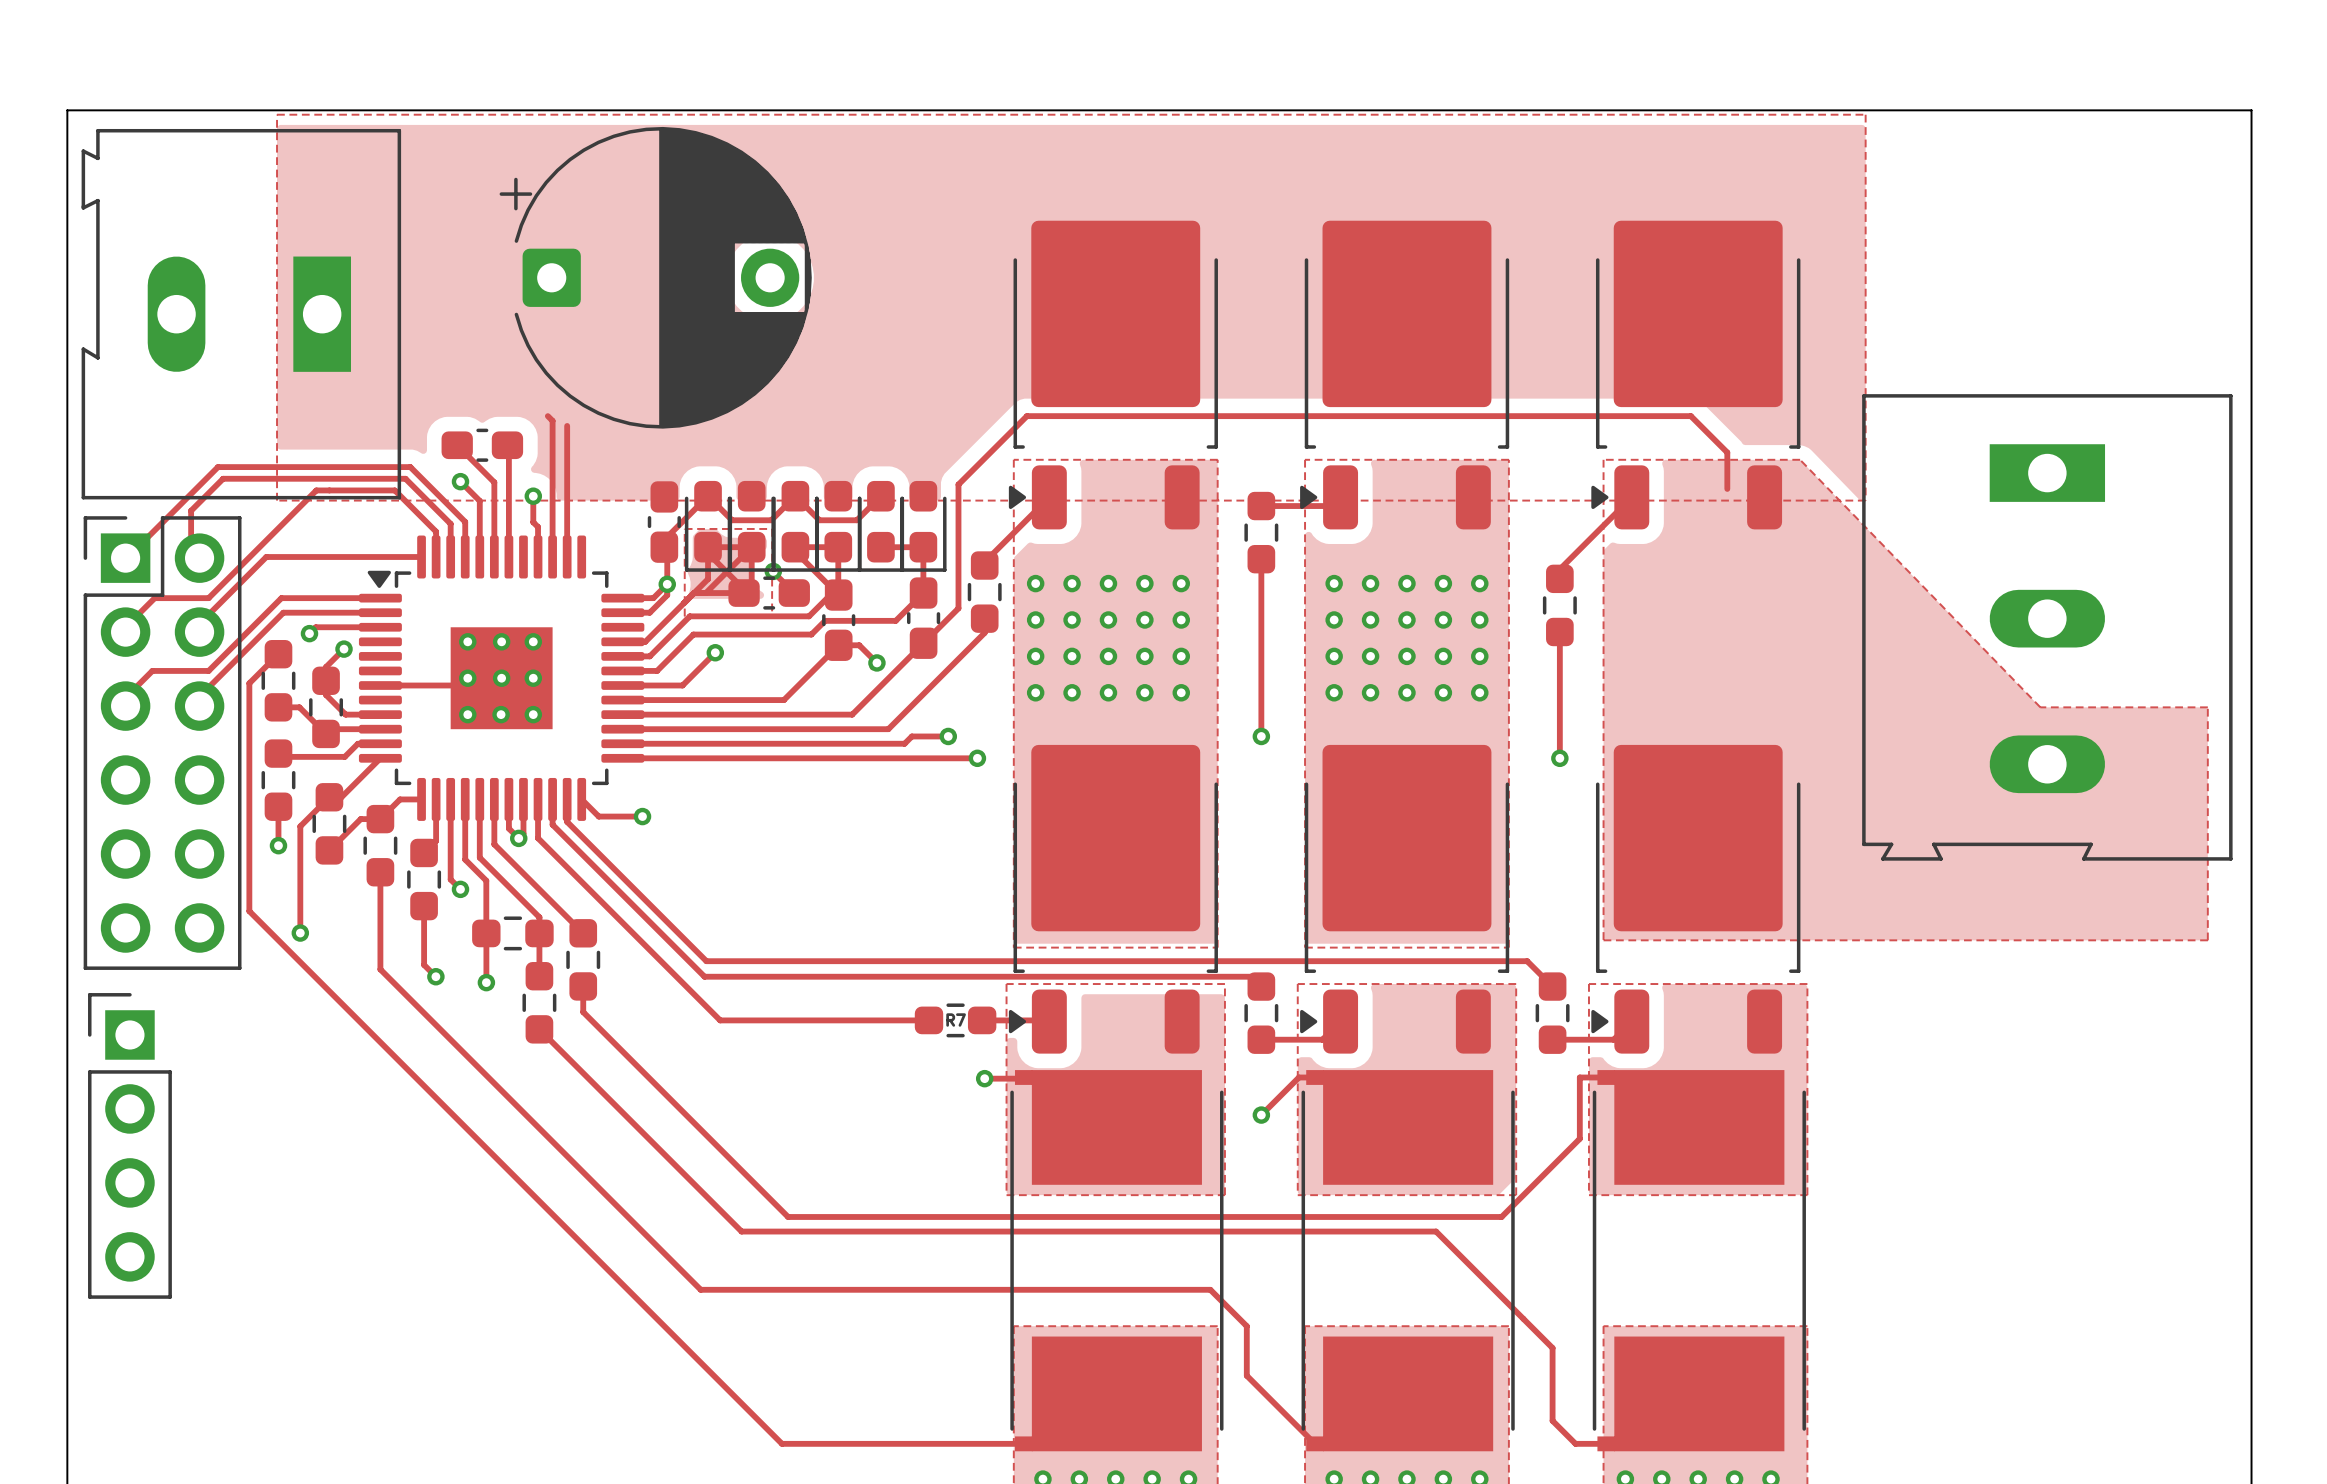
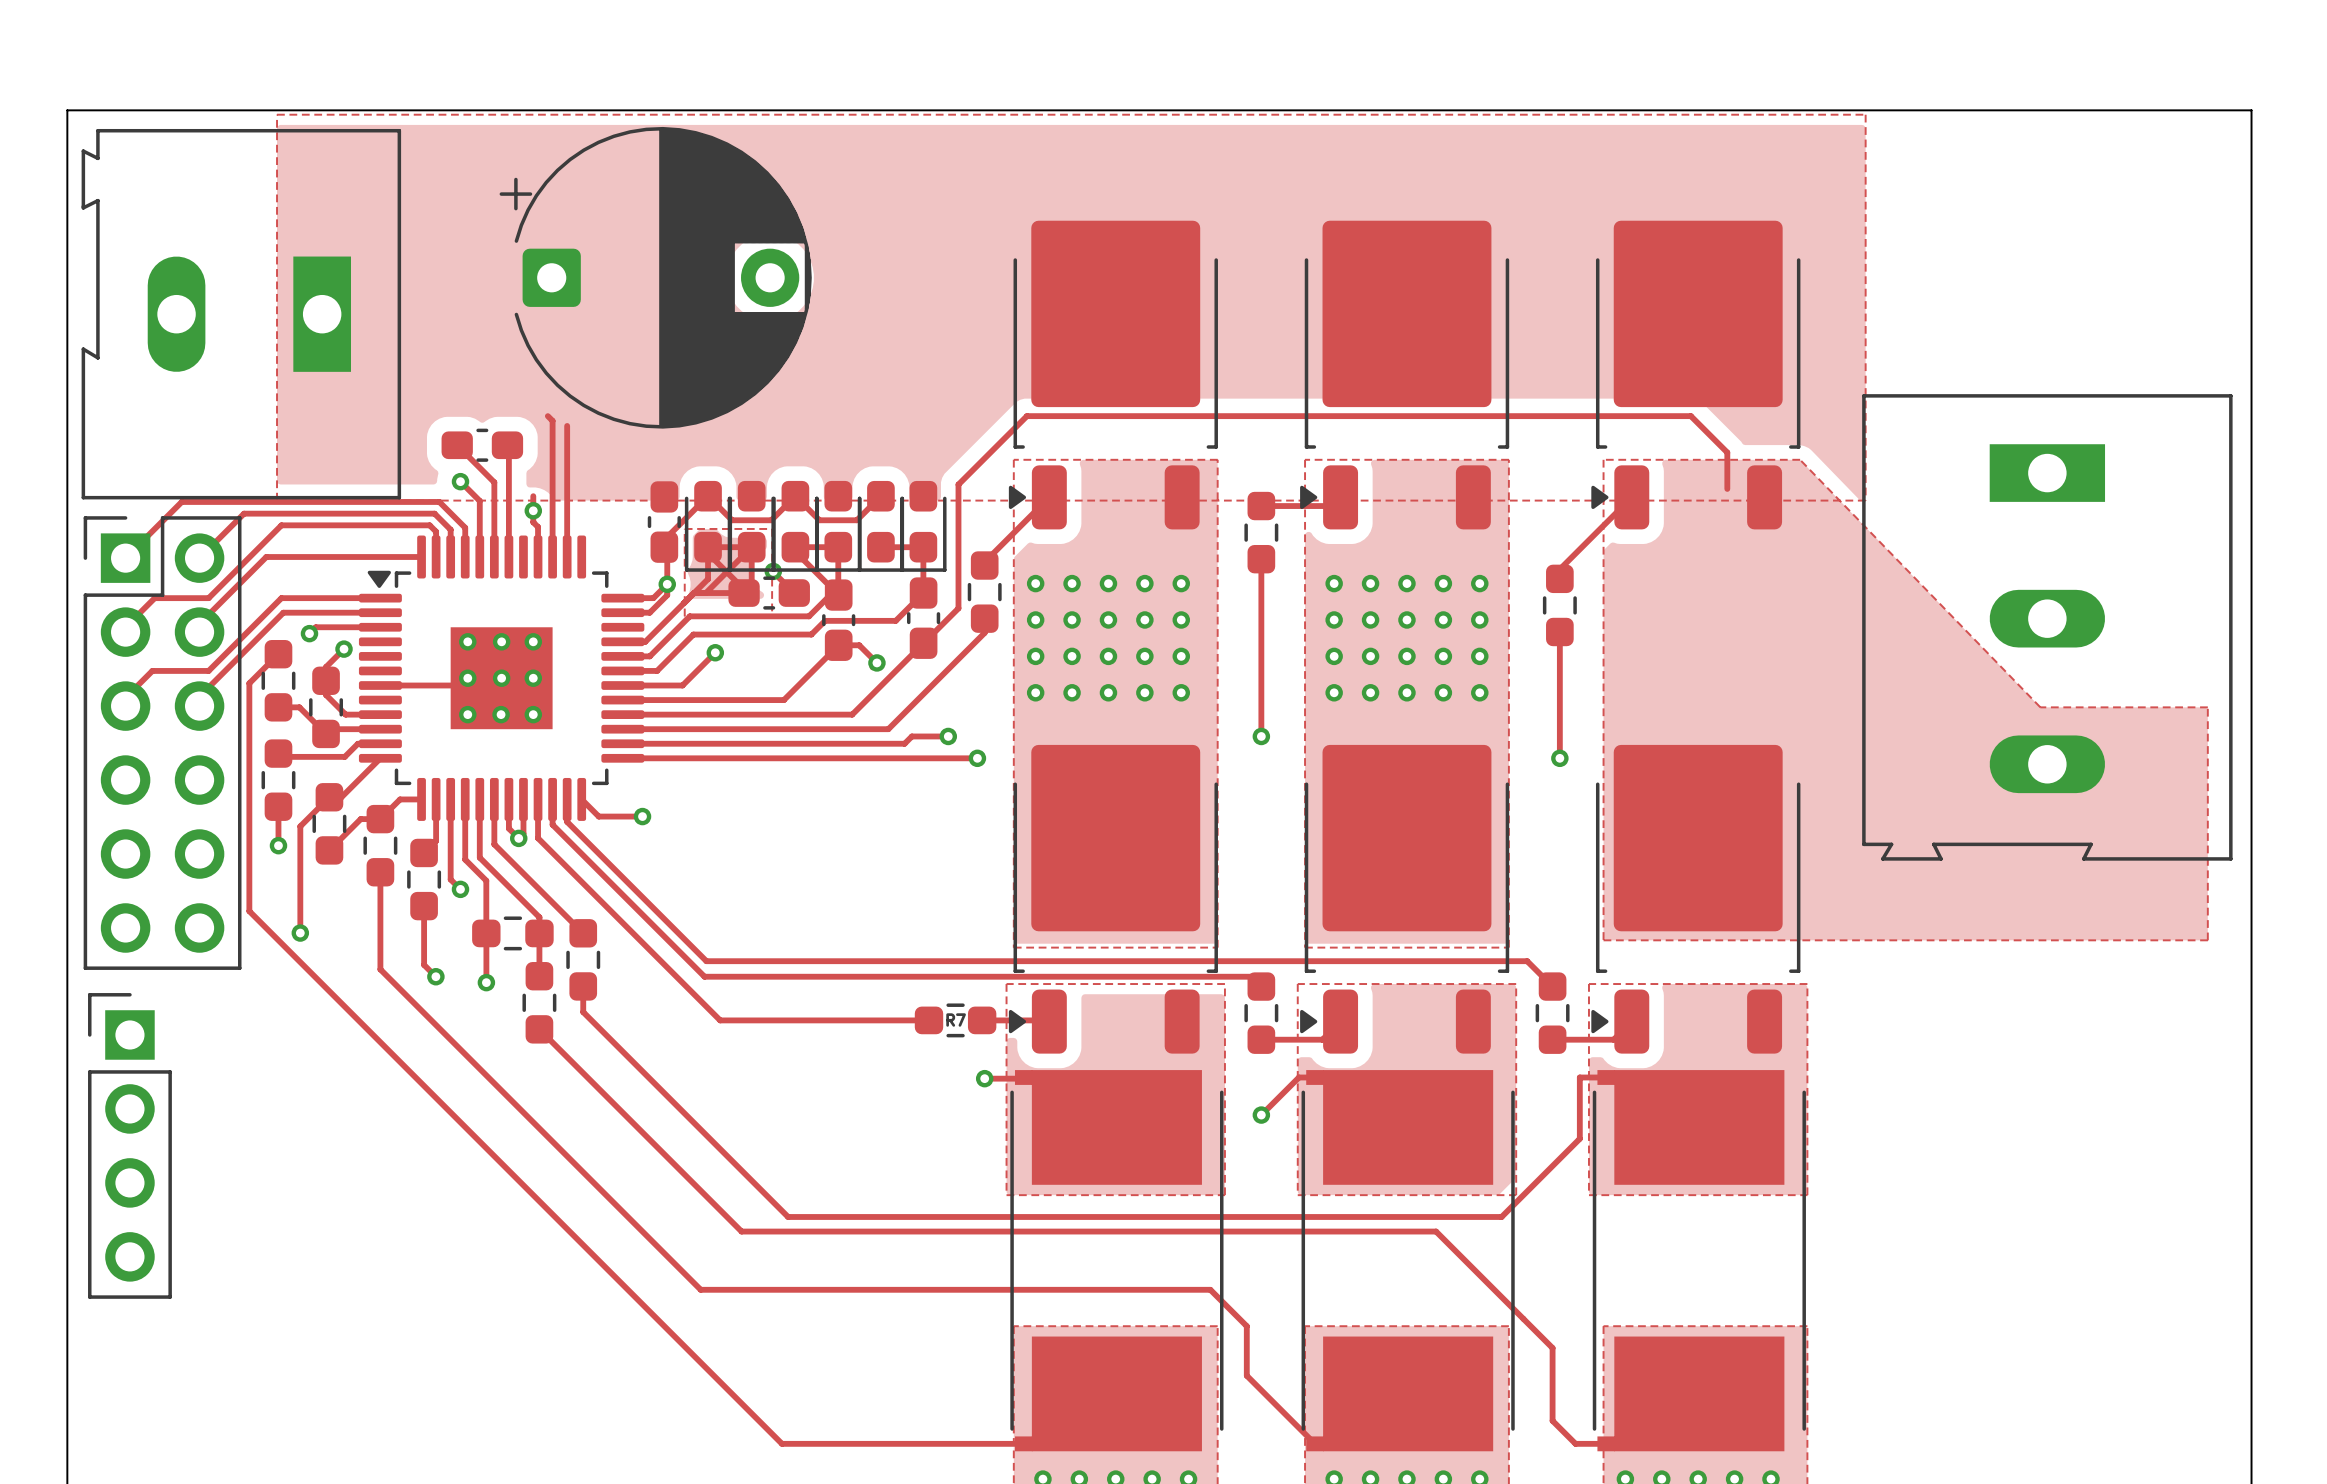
via position: (533, 496) -> (533, 510)
track: (281, 525) (316, 490) (394, 490) (429, 525) -> (281, 525) (429, 525)
track: (465, 527) (465, 521) (410, 467) (217, 467) (130, 554) -> (465, 527) (439, 501) (181, 501) (125, 558)
track: (450, 529) (450, 523) (405, 478) (223, 478) (191, 510) (191, 554) (195, 558) (199, 558) -> (450, 529) (434, 513) (244, 513) (199, 558)

